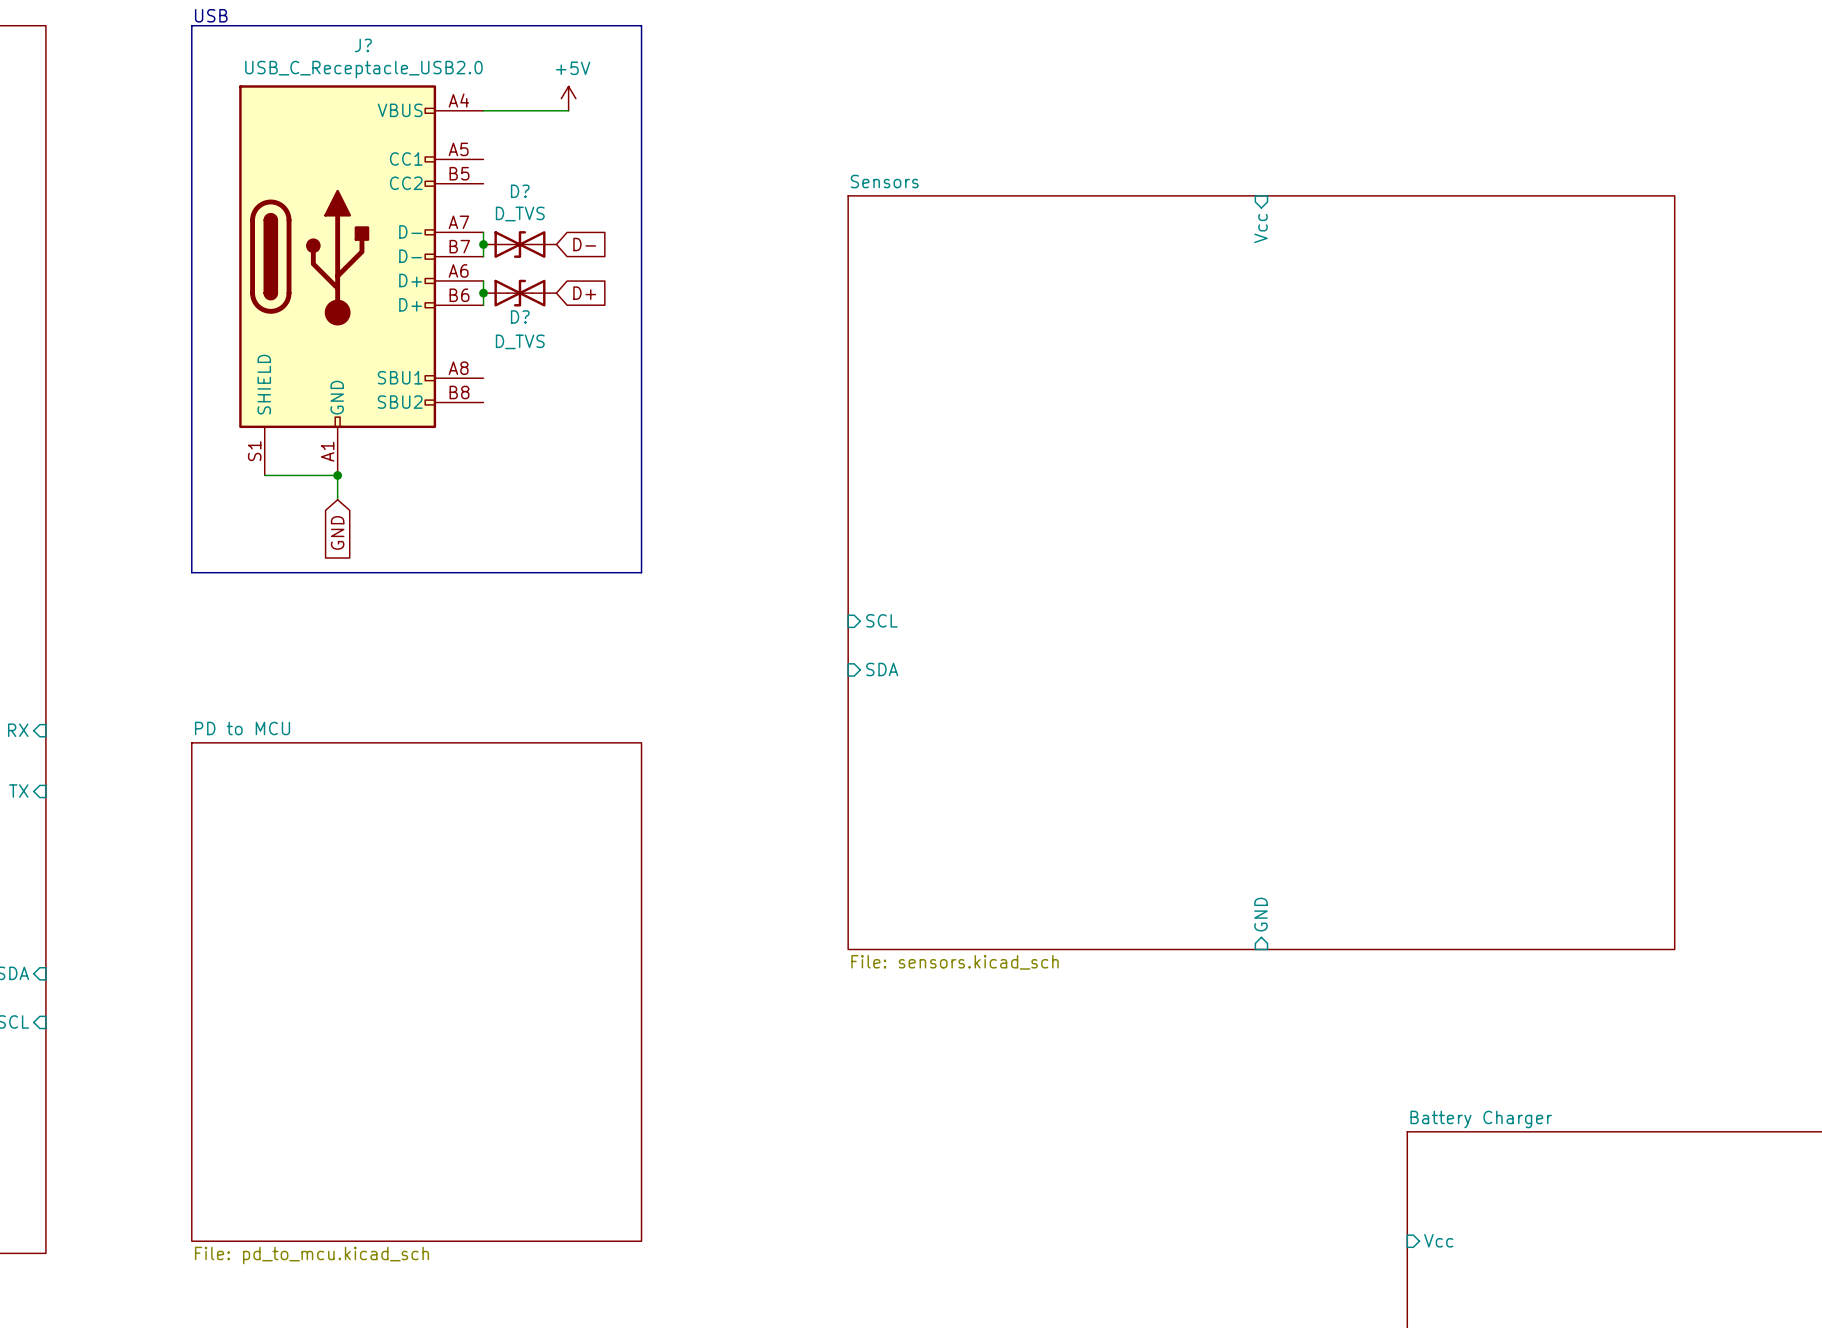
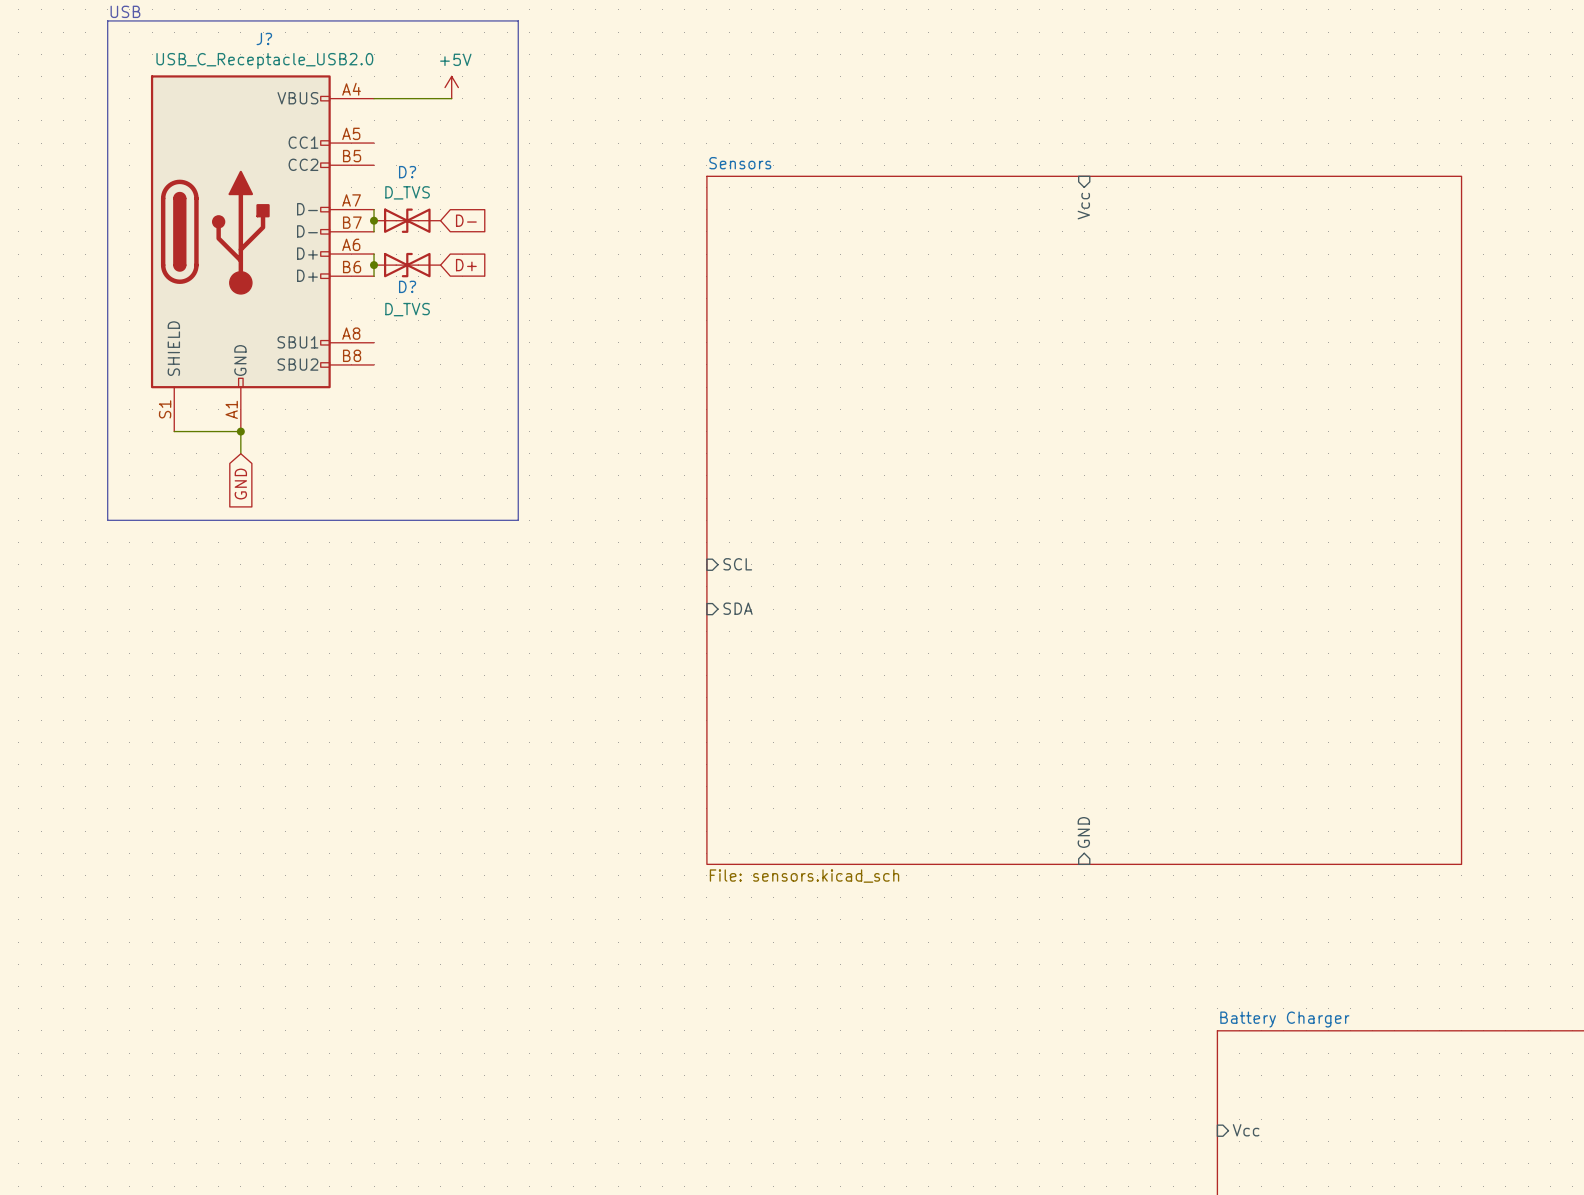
sheet PD to MCU: File: pd_to_mcu.kicad_sch (416, 992) -> none

